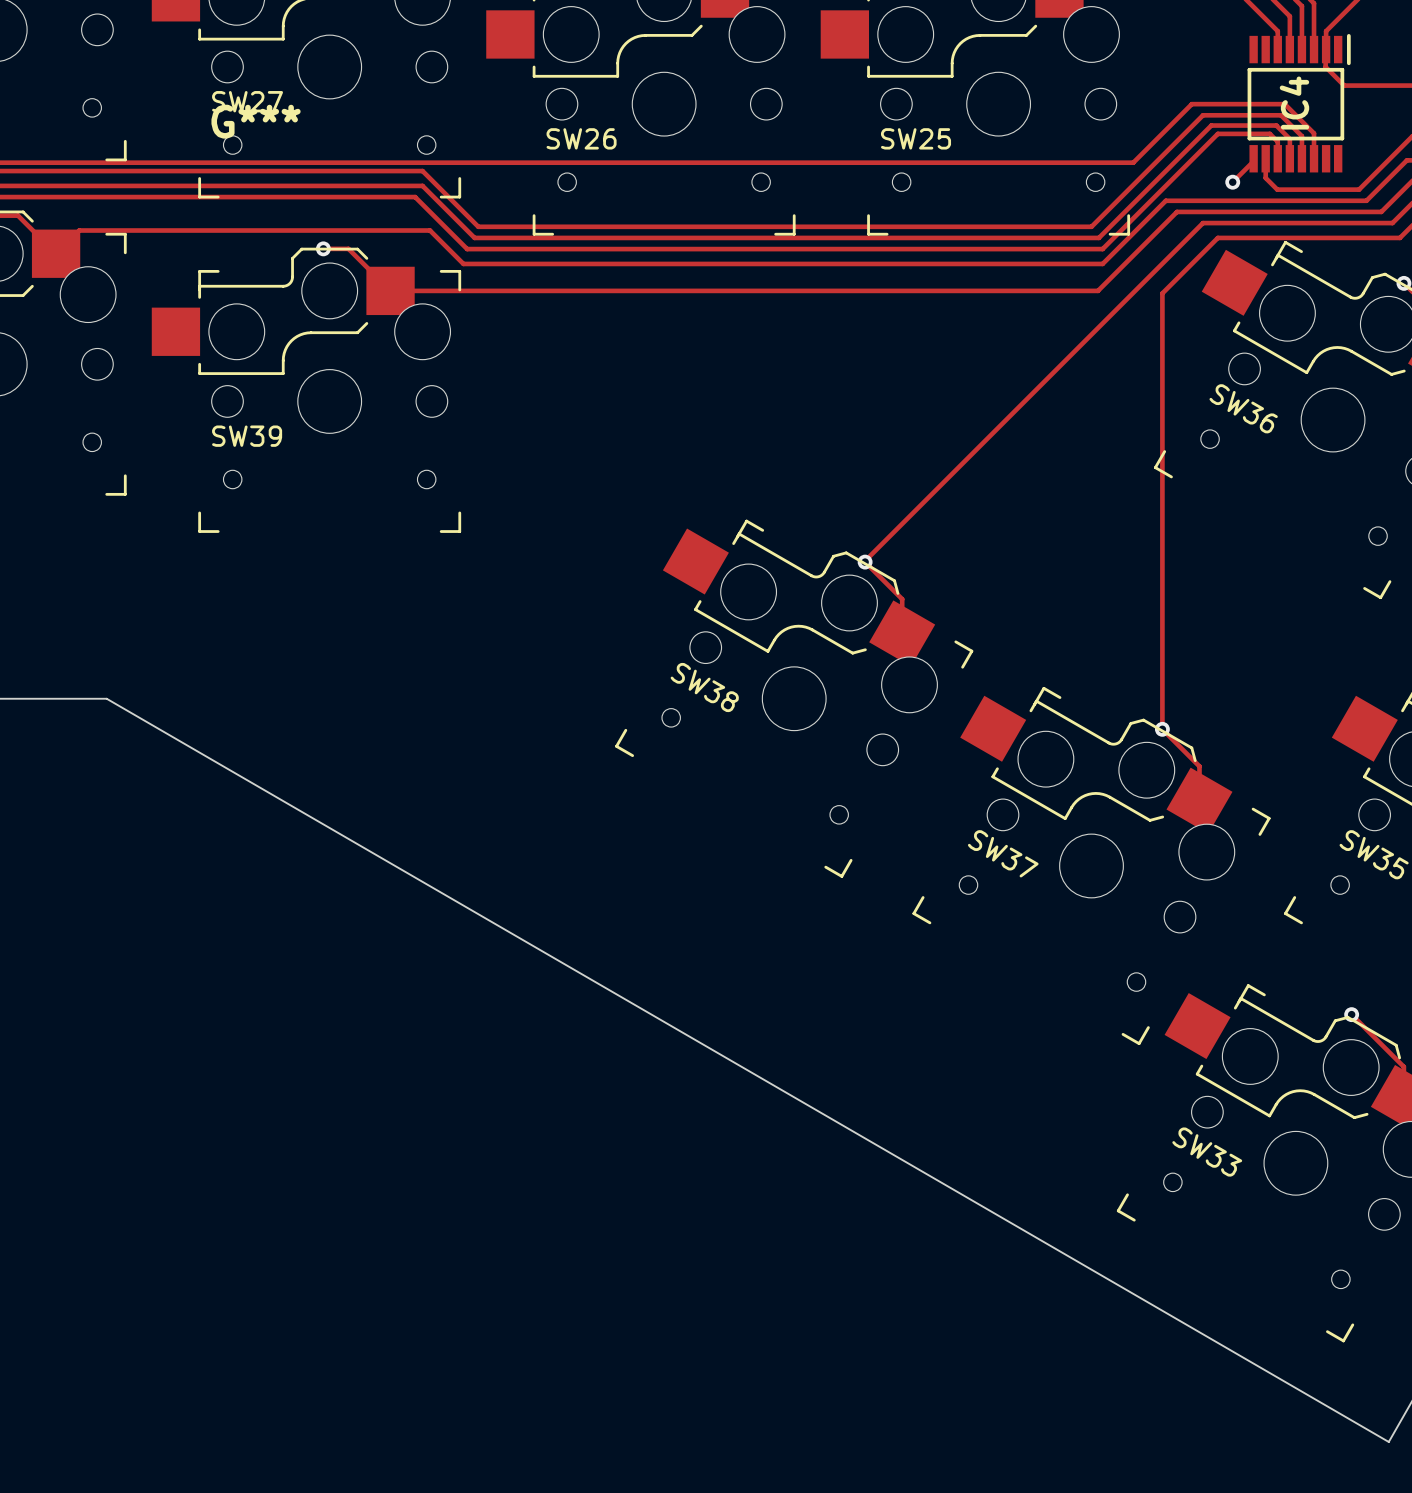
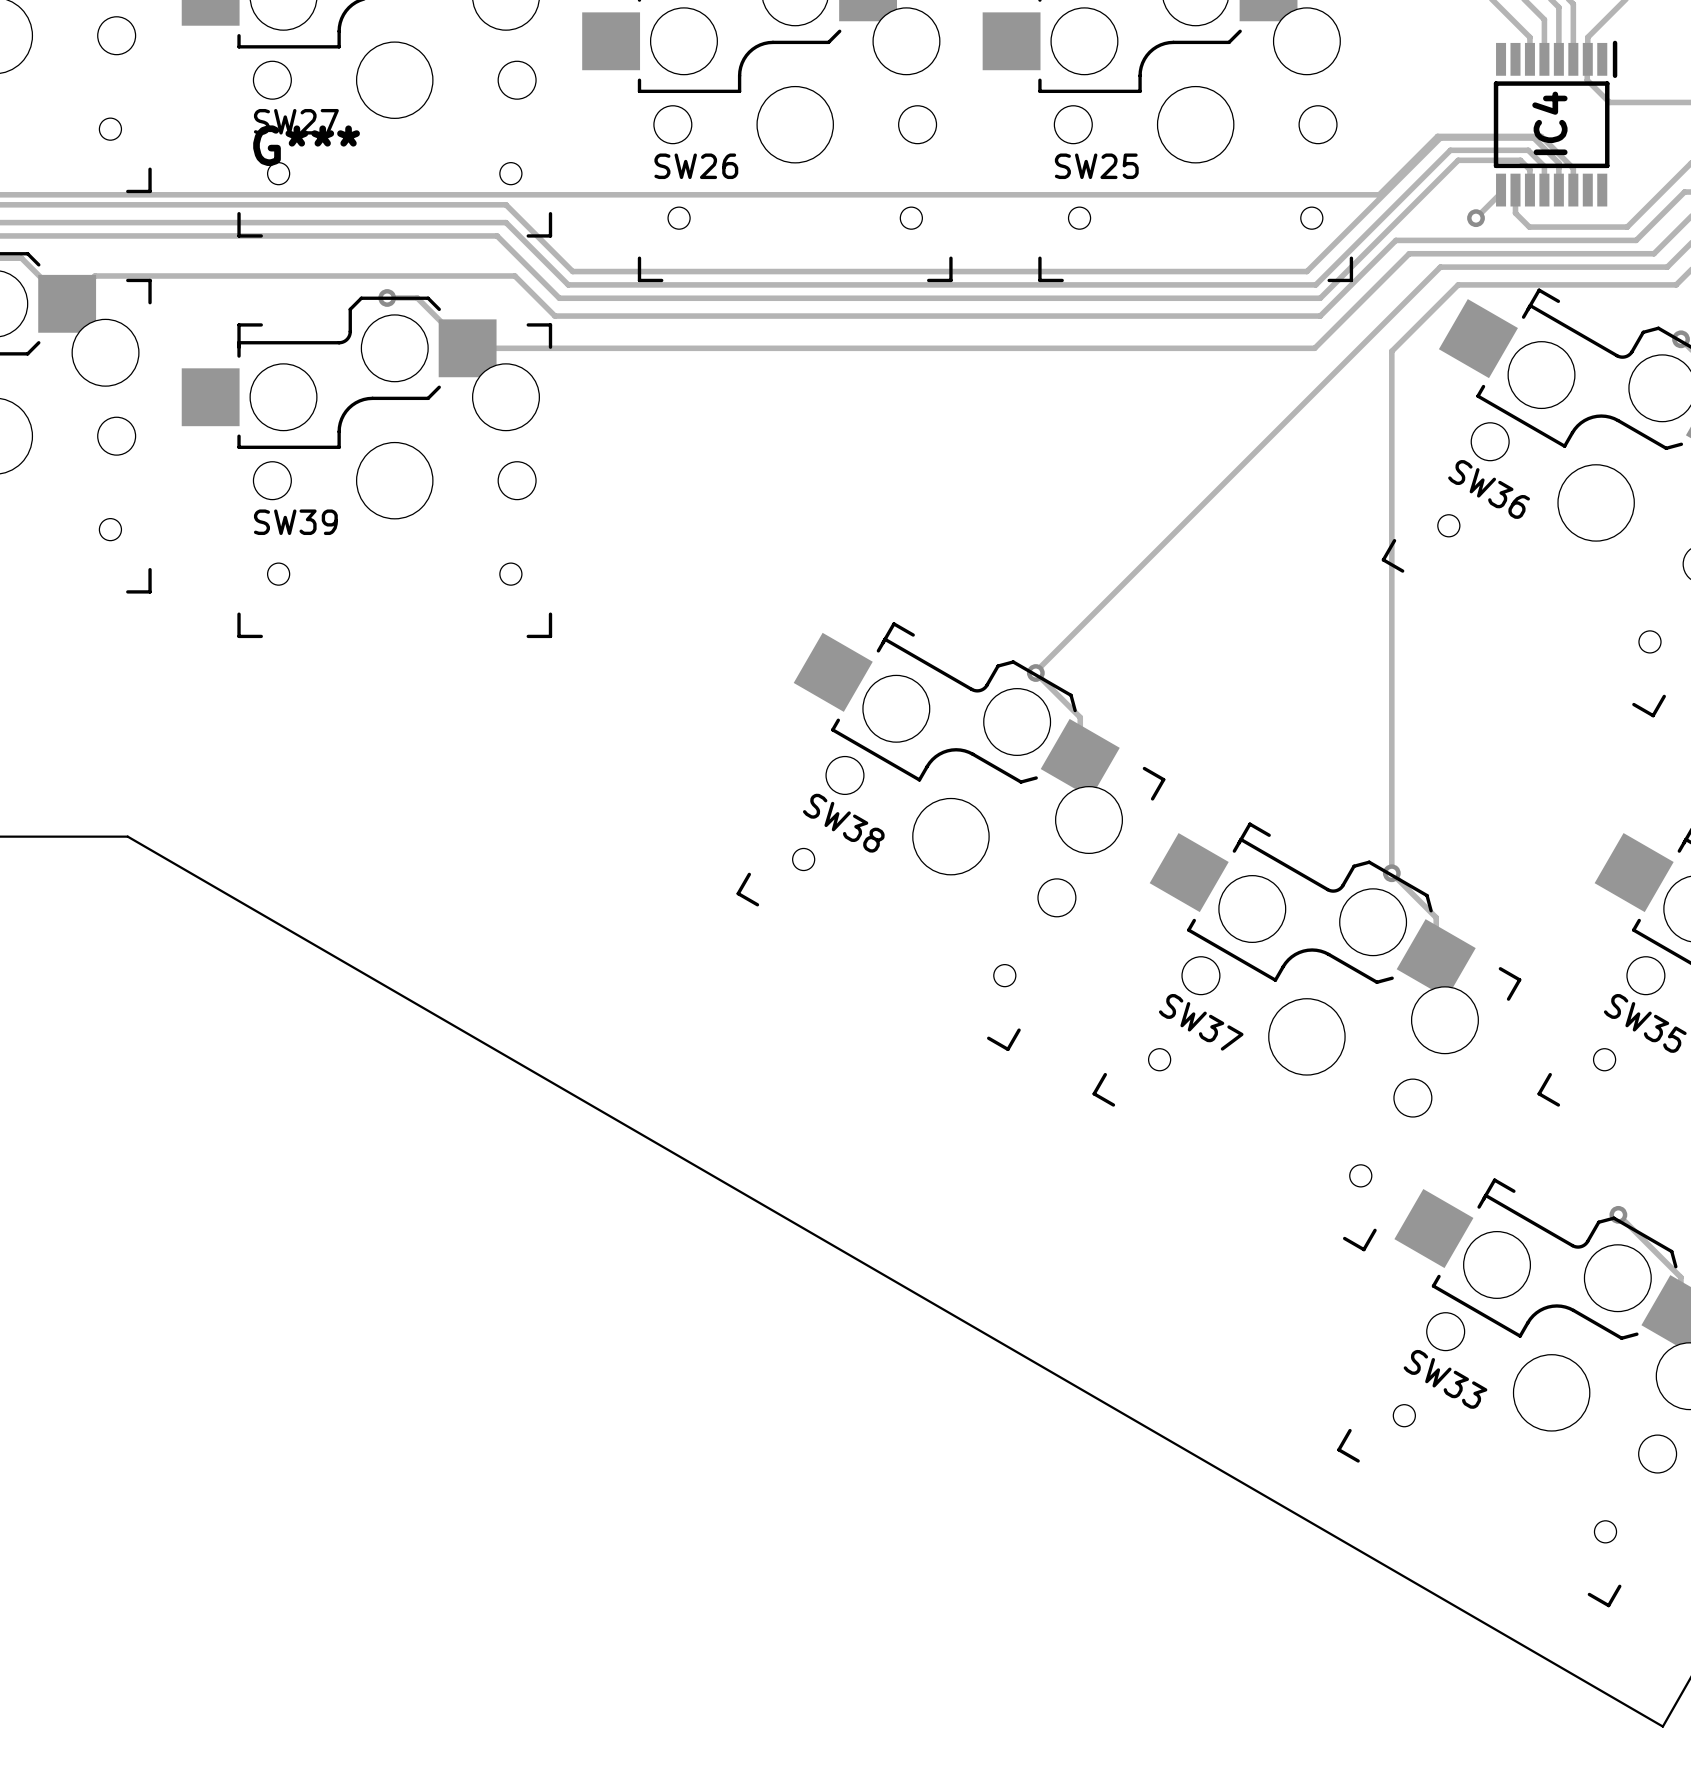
track: (1314, 140) (1314, 133) (1284, 104) (1191, 104) (1133, 162) -> (1573, 168) (1541, 136) (1437, 136) (1379, 194) (1356, 194)

